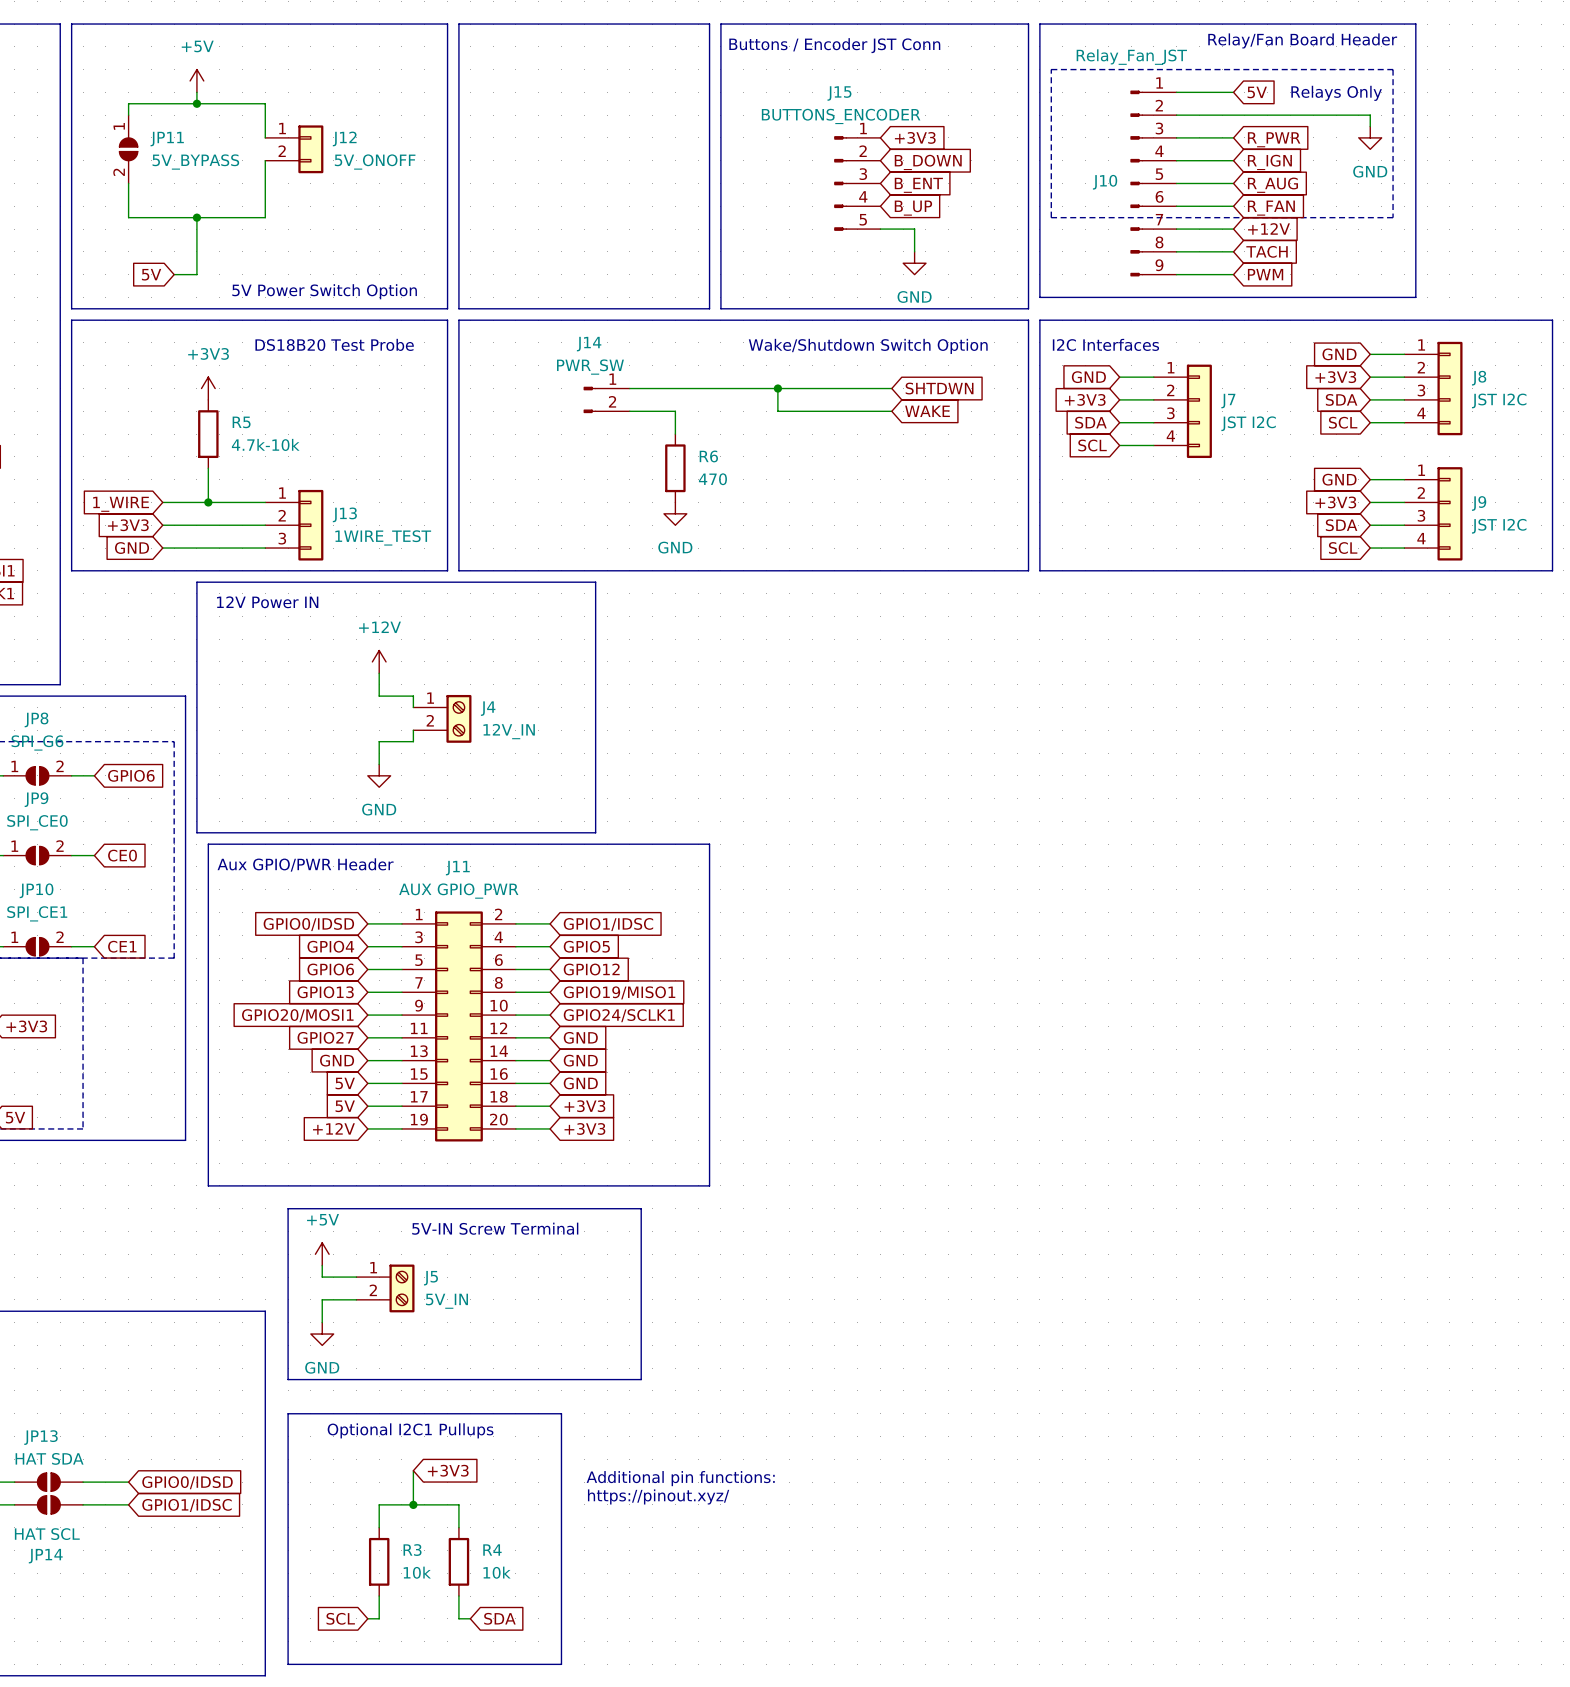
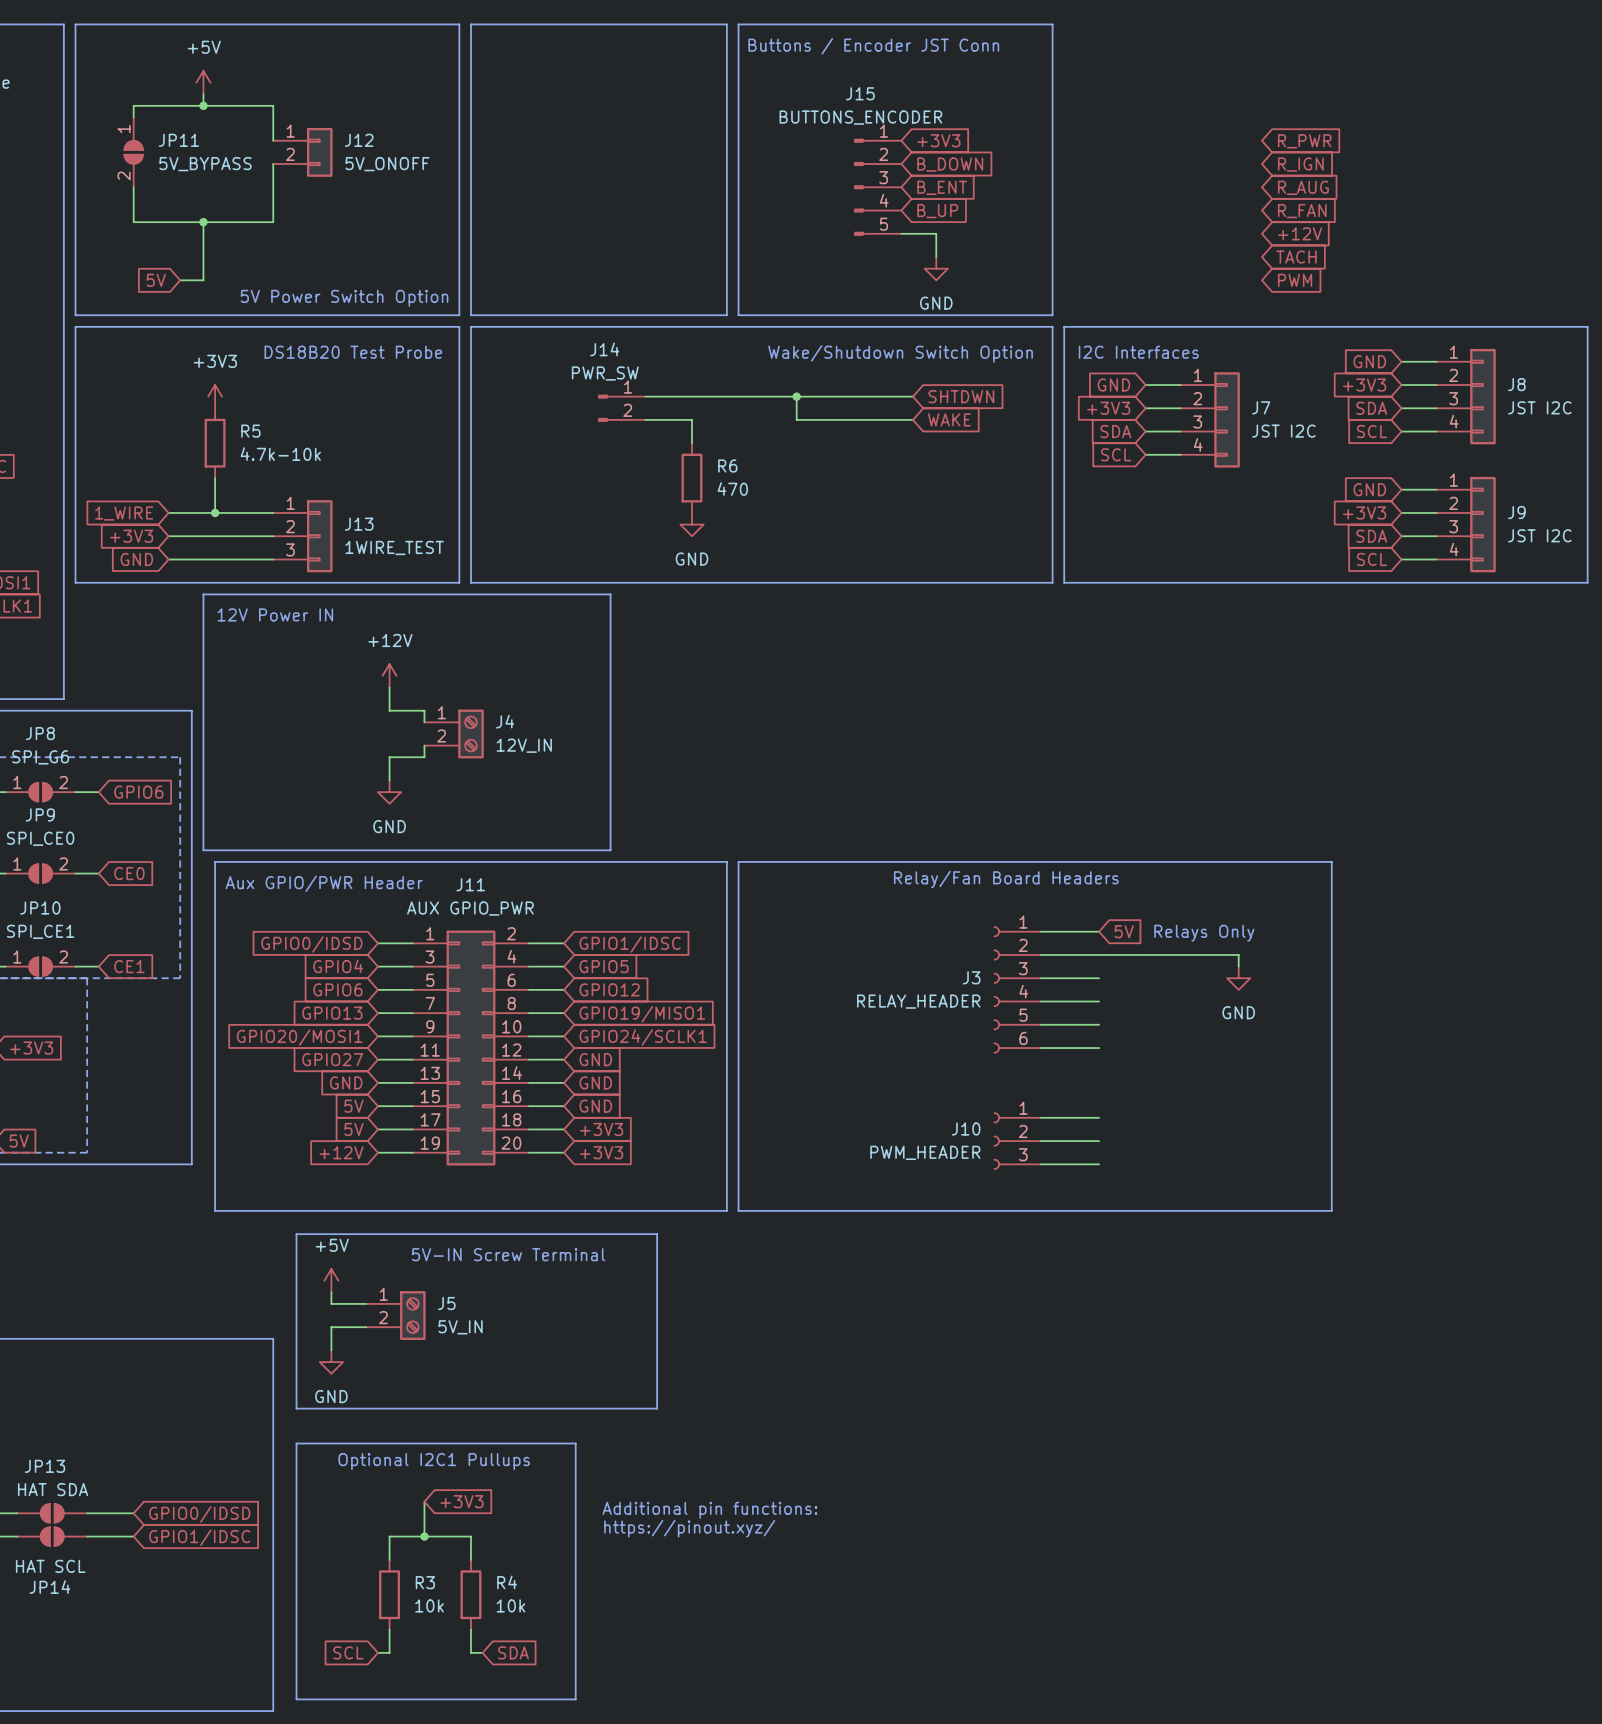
line: (1039, 24) (1039, 297) (1415, 297) (1415, 24) (1039, 24) -> none
text: Relay/Fan Board Header (1302, 40) -> none
J10 value: Relay_Fan_JST (1131, 57) -> PWM_HEADER (925, 1152)
line: (1051, 69) (1393, 69) (1393, 217) (1051, 217) (1051, 69) -> none
J10 symbol: [1130, 90, 1177, 277] -> [993, 1112, 1041, 1170]
wire: (1176, 92) (1233, 92) -> none
global label: 5V (1257, 92) -> none
text: Relays Only (1336, 93) -> none
wire: (1176, 115) (1370, 115) (1370, 126) -> none
wire: (1176, 137) (1233, 137) -> none
power symbol: GND (1370, 137) -> none
wire: (1176, 160) (1233, 160) -> none
wire: (1176, 183) (1233, 183) -> none
wire: (1176, 206) (1233, 206) -> none
wire: (1176, 229) (1233, 229) -> none
wire: (1176, 251) (1233, 251) -> none
wire: (1176, 274) (1233, 274) -> none
line: none -> (738, 861) (738, 1210) (1331, 1210) (1331, 861) (738, 861)
text: none -> Relay/Fan Board Headers (1006, 879)
wire: none -> (1040, 931) (1099, 931)
global label: none -> 5V (1124, 931)
text: none -> Relays Only (1204, 933)
wire: none -> (1040, 954) (1238, 954) (1238, 966)
wire: none -> (1040, 978) (1099, 978)
power symbol: none -> GND (1238, 978)
J3: none -> RELAY_HEADER (1017, 989)
wire: none -> (1040, 1001) (1099, 1001)
wire: none -> (1040, 1024) (1099, 1024)
wire: none -> (1040, 1048) (1099, 1048)
wire: none -> (1040, 1117) (1099, 1117)
wire: none -> (1040, 1141) (1099, 1141)
wire: none -> (1040, 1164) (1099, 1164)

